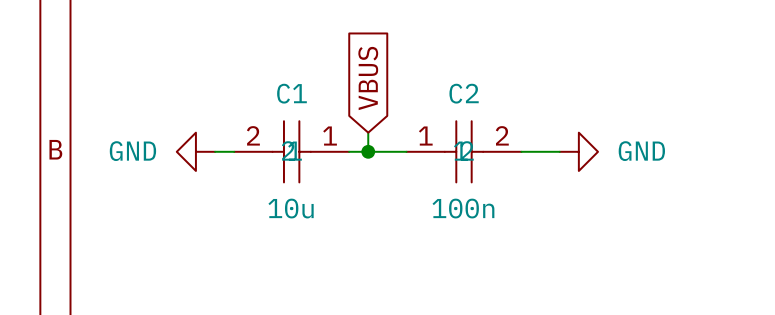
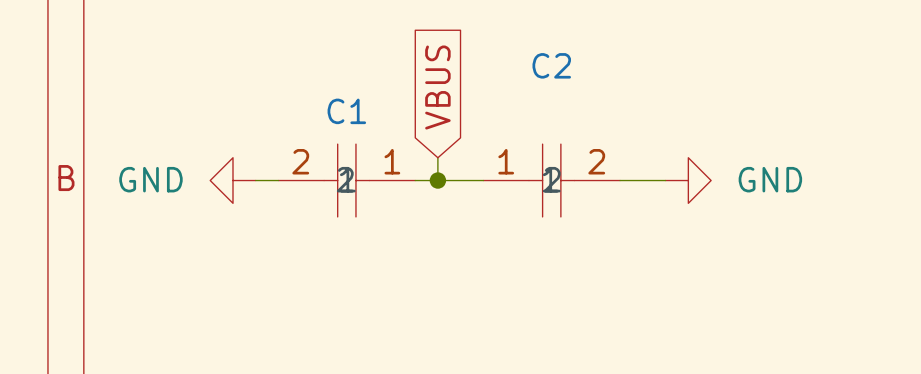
C2 name position: C2 (464, 93) -> C2 (551, 65)
C1 value: 10u (291, 208) -> none
C2 value: 100n (463, 208) -> none

